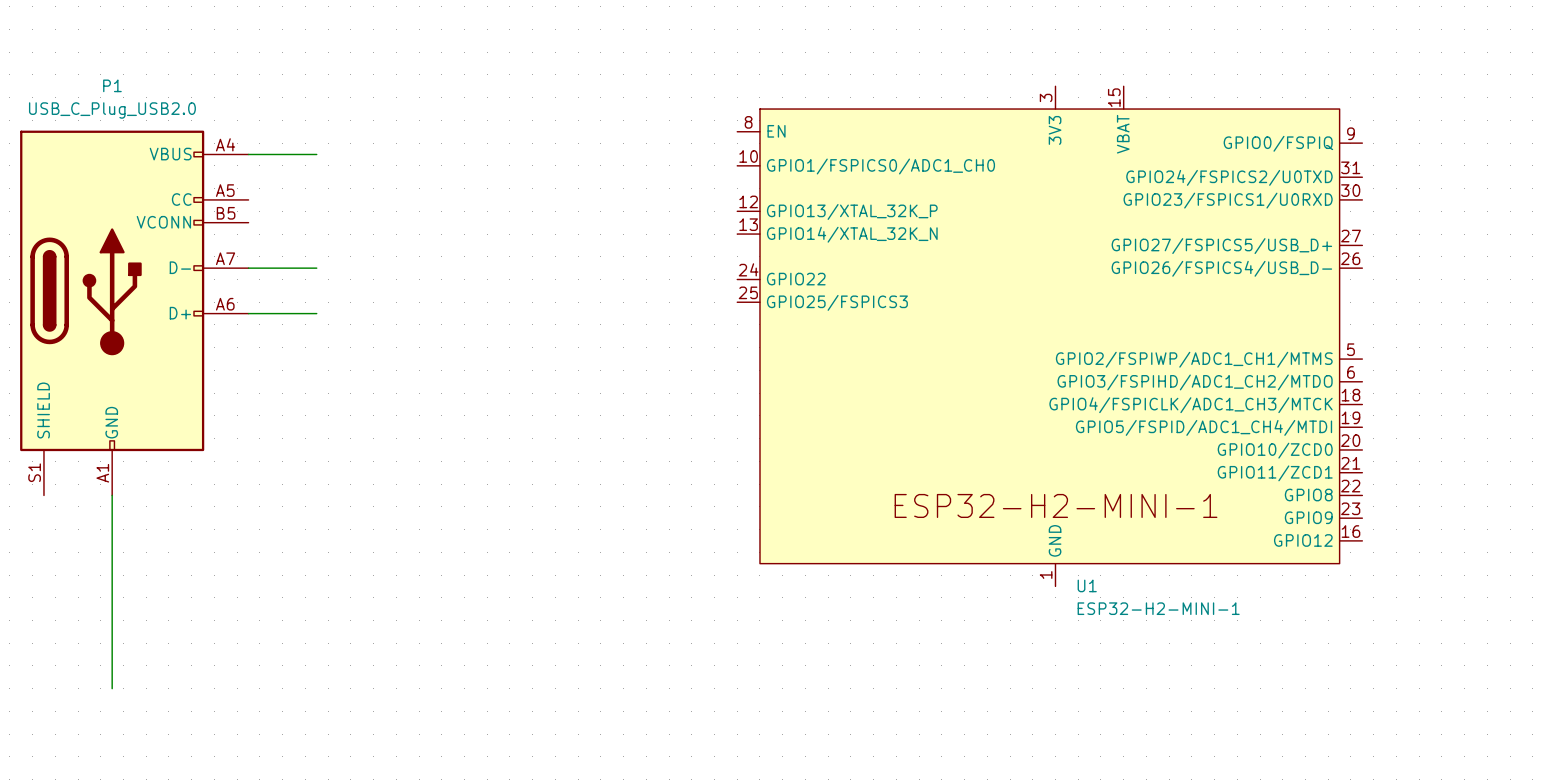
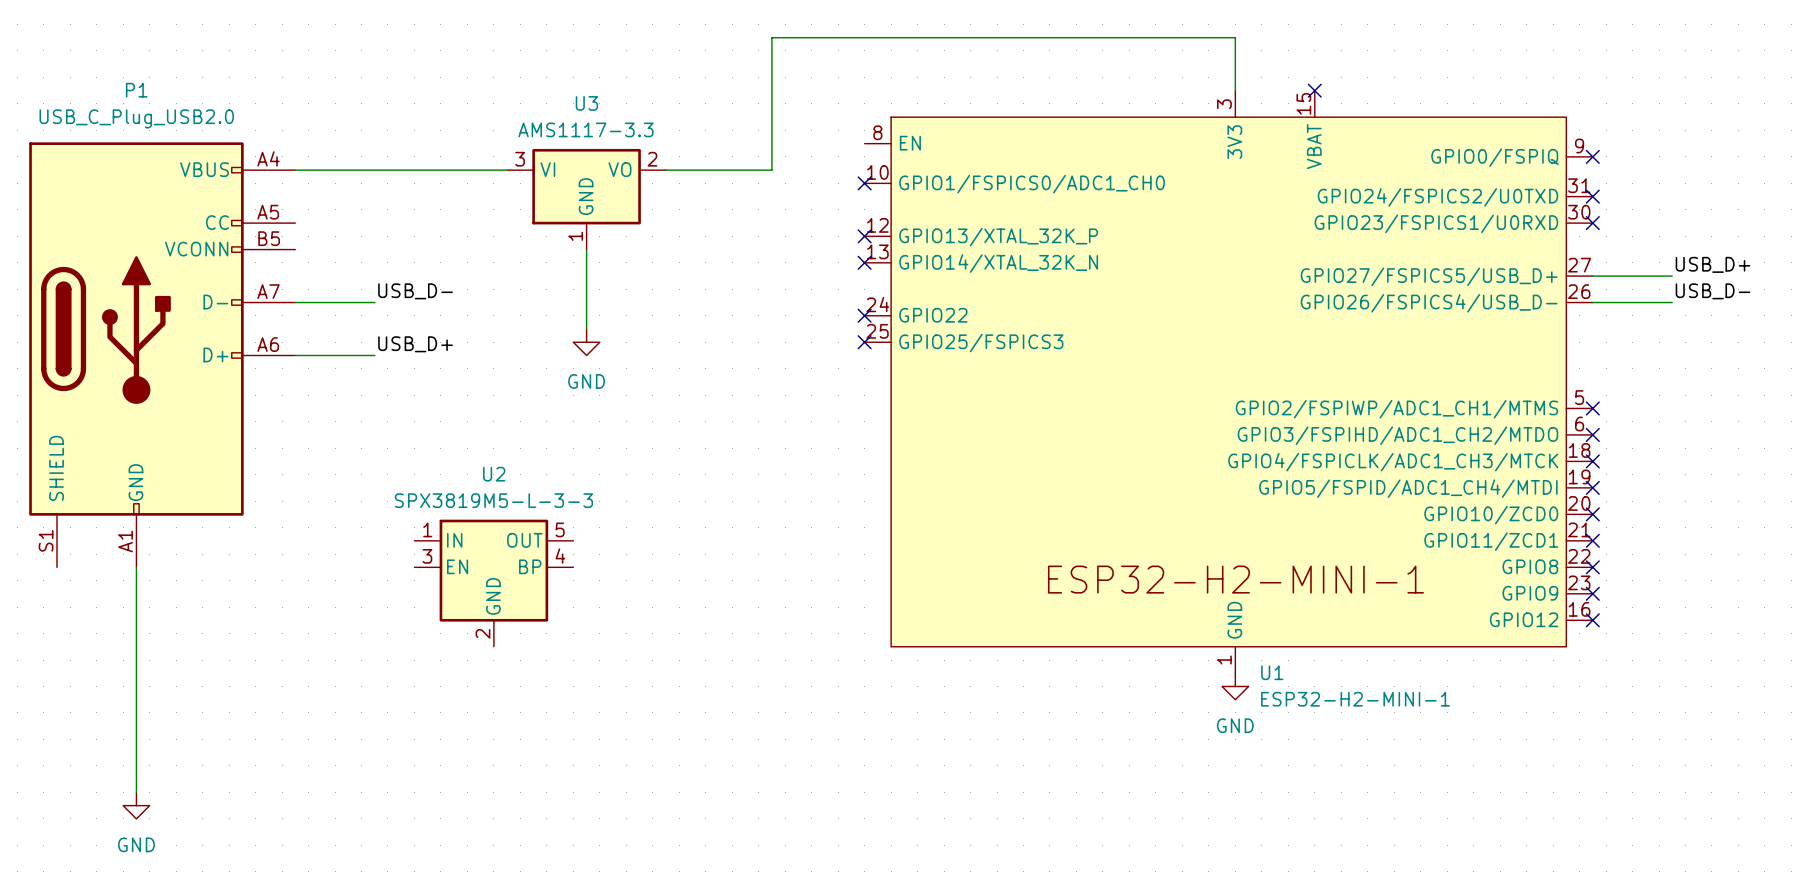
wire: none -> (1235, 90) (1235, 37) (771, 37) (771, 170) (666, 170)
no-connect mark: none -> (1314, 90)
no-connect mark: none -> (1592, 156)
wire: none -> (374, 170) (507, 170)
no-connect mark: none -> (864, 183)
no-connect mark: none -> (1592, 196)
U3: none -> AMS1117-3.3 (586, 199)
no-connect mark: none -> (1592, 223)
no-connect mark: none -> (864, 236)
wire: none -> (586, 249) (586, 329)
no-connect mark: none -> (864, 262)
label: none -> USB_D+ (1713, 264)
wire: none -> (1592, 276) (1672, 276)
label: none -> USB_D- (415, 291)
label: none -> USB_D- (1713, 291)
wire: none -> (1592, 302) (1672, 302)
no-connect mark: none -> (864, 315)
power symbol: none -> GND (586, 342)
no-connect mark: none -> (864, 342)
label: none -> USB_D+ (415, 344)
no-connect mark: none -> (1592, 408)
no-connect mark: none -> (1592, 434)
no-connect mark: none -> (1592, 461)
no-connect mark: none -> (1592, 487)
no-connect mark: none -> (1592, 514)
no-connect mark: none -> (1592, 540)
no-connect mark: none -> (1592, 567)
U2: none -> SPX3819M5-L-3-3 (493, 583)
no-connect mark: none -> (1592, 593)
no-connect mark: none -> (1592, 620)
power symbol: none -> GND (1235, 686)
power symbol: none -> GND (136, 805)

